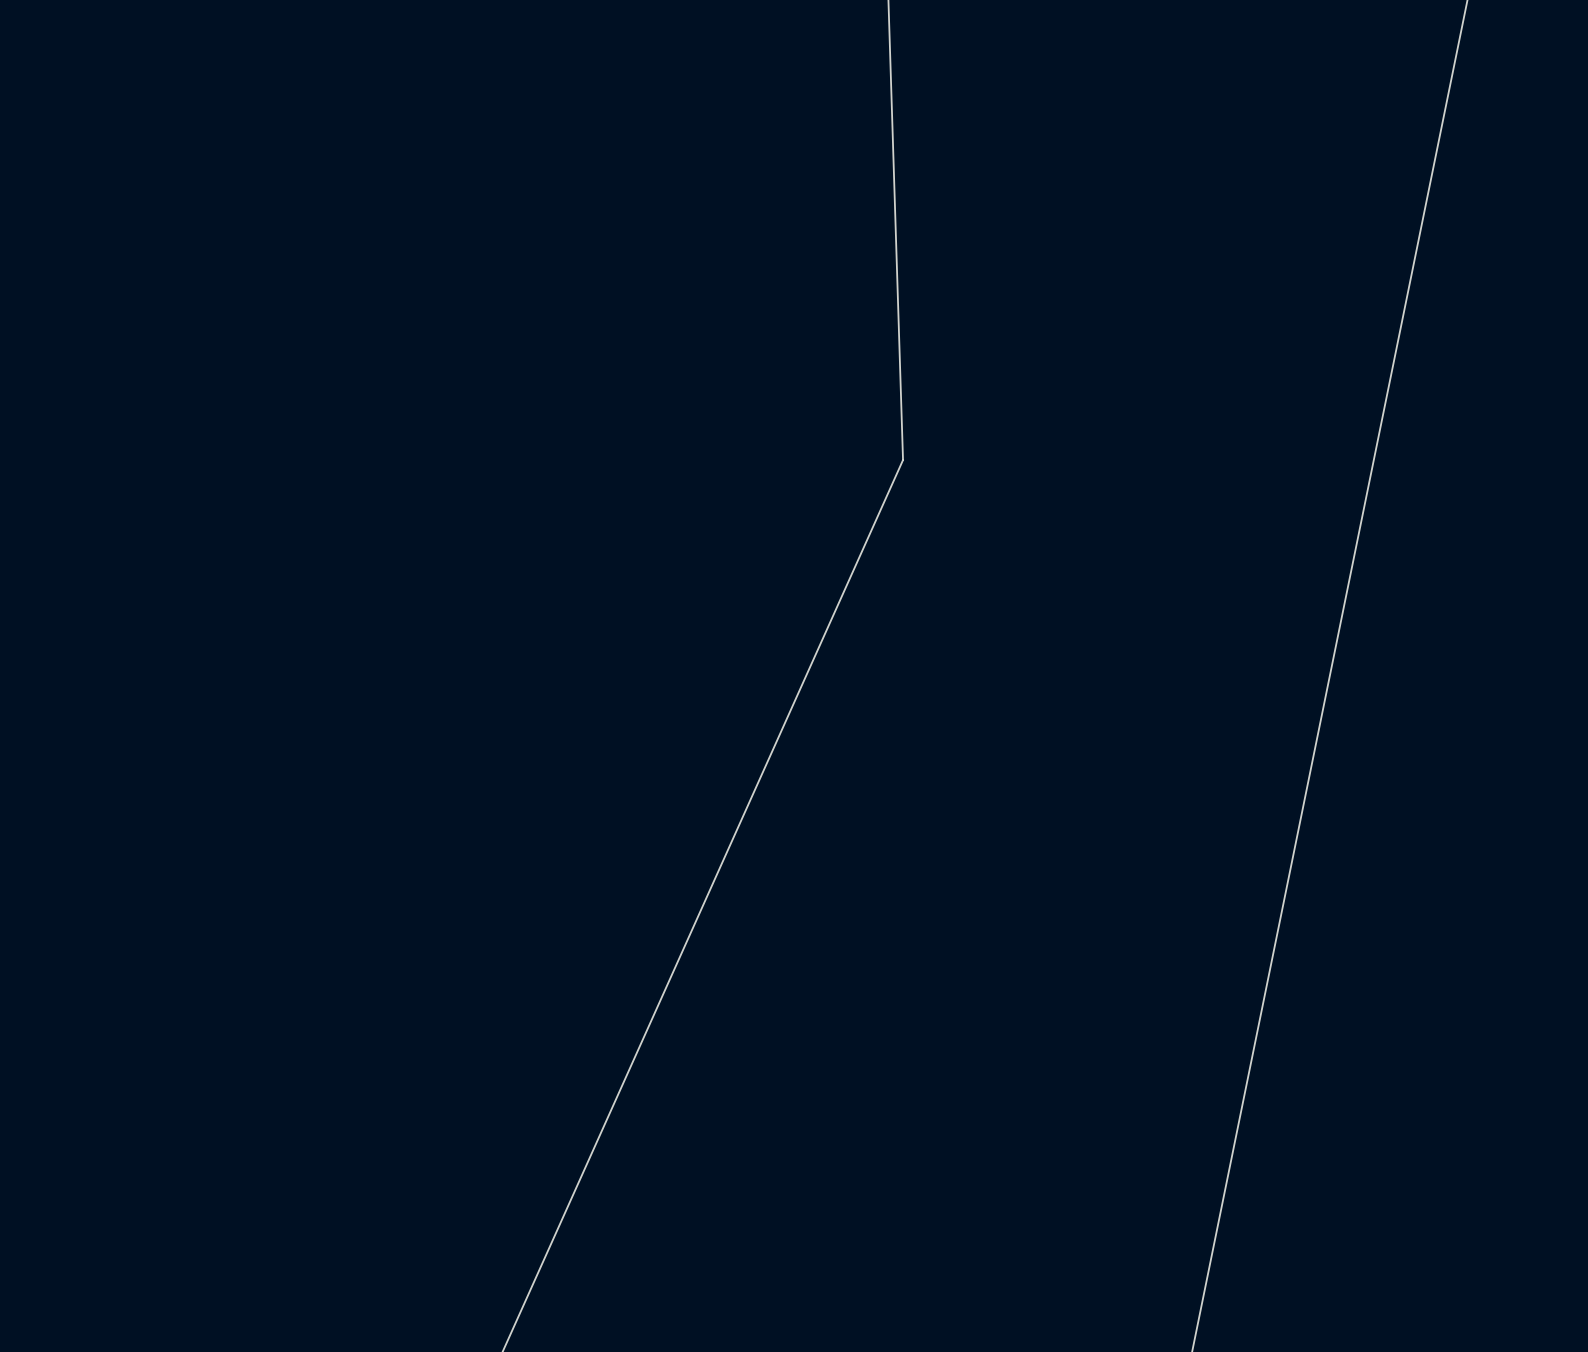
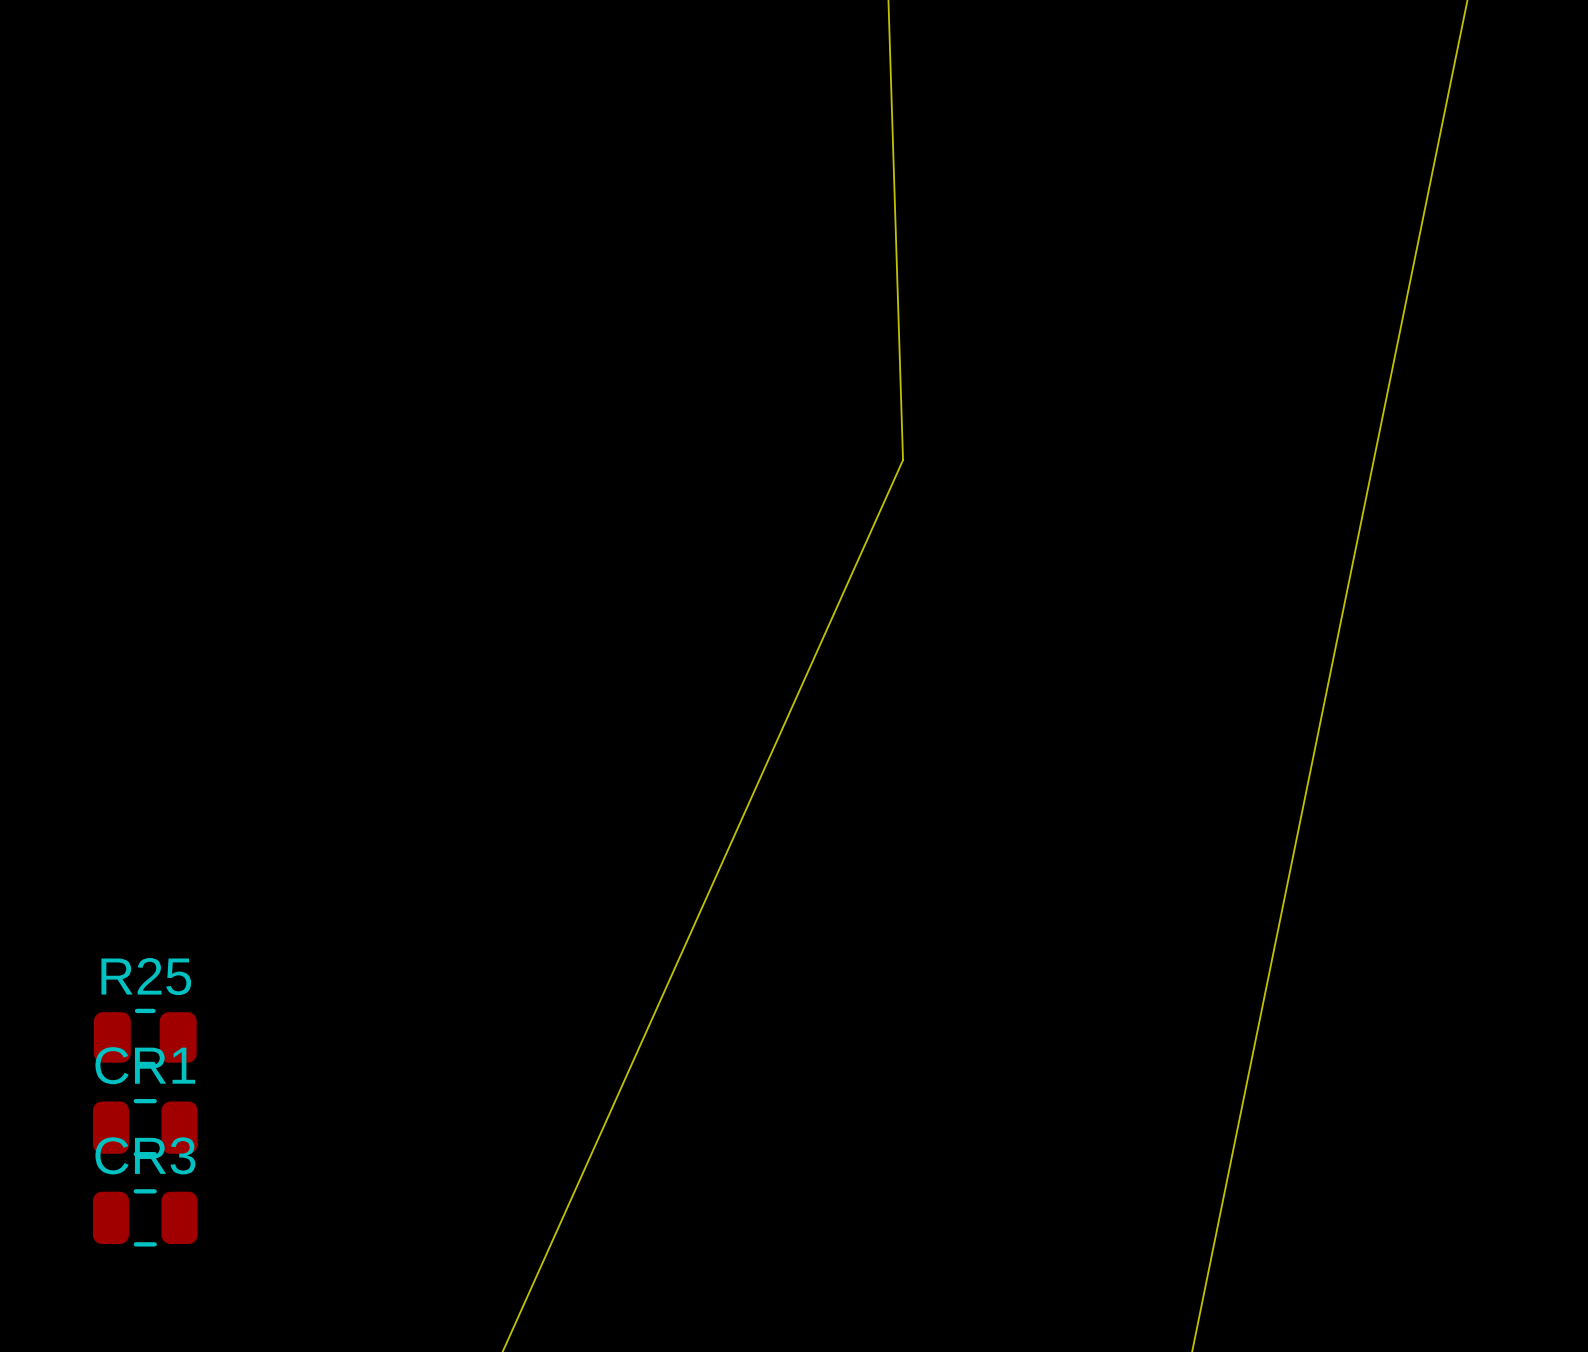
R25: none -> (145, 1037)
CR1: none -> (145, 1127)
CR3: none -> (145, 1217)

